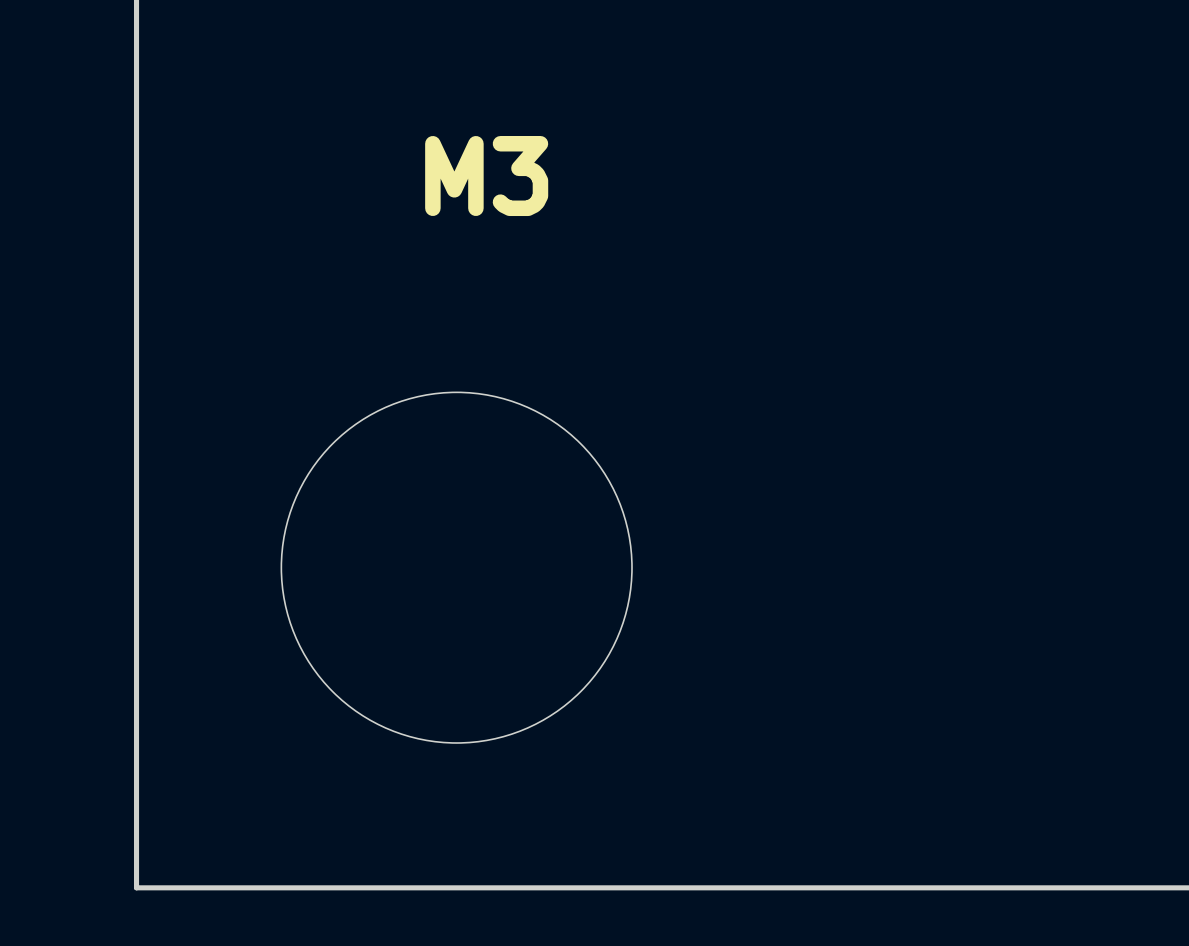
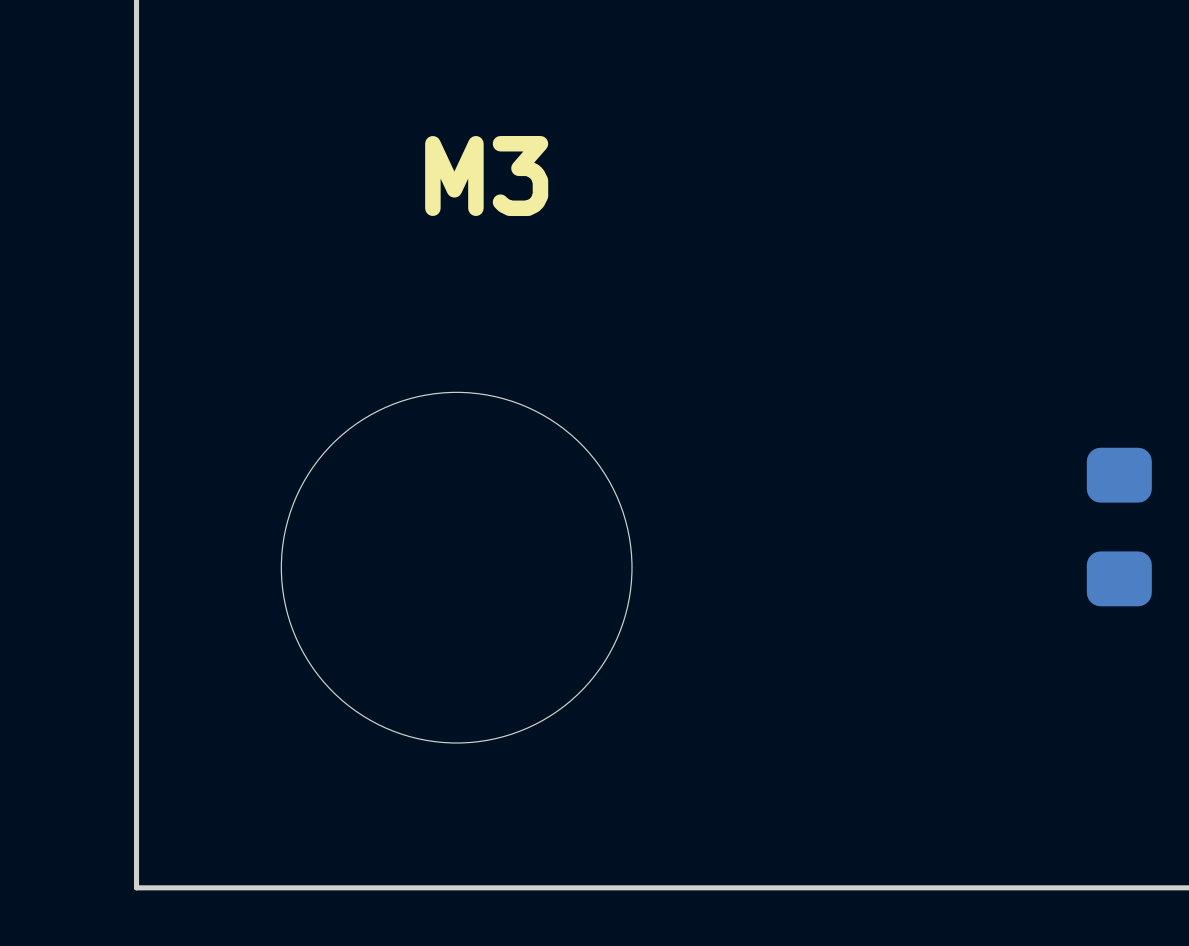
part: none -> (1119, 527)

